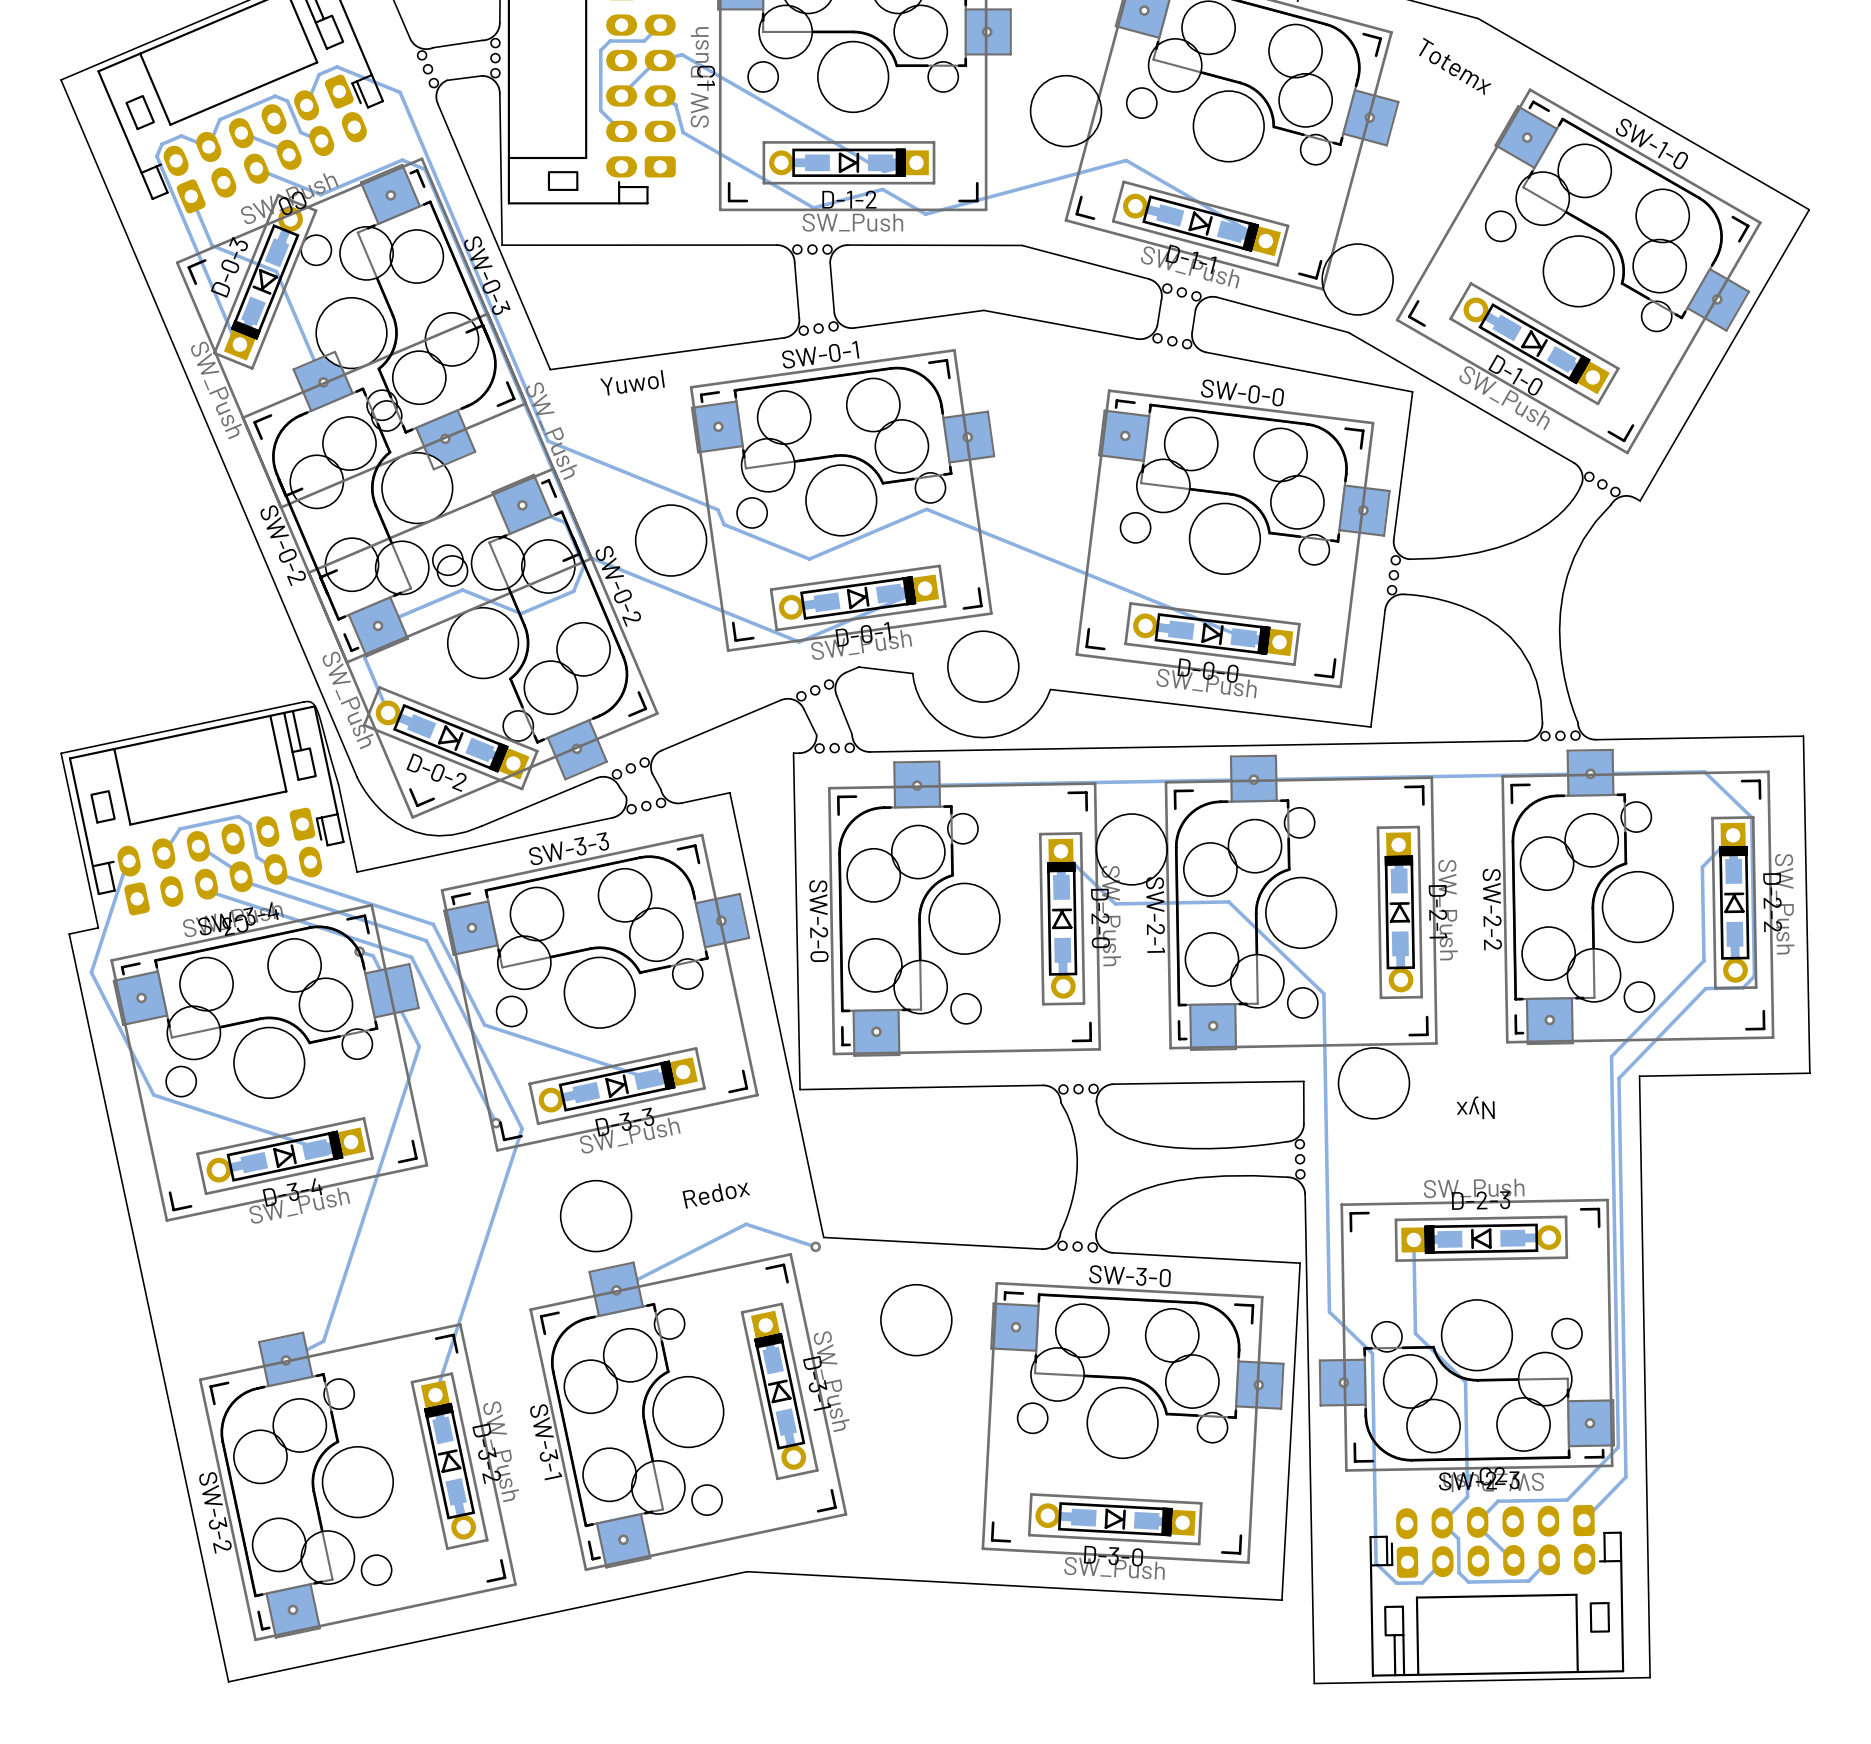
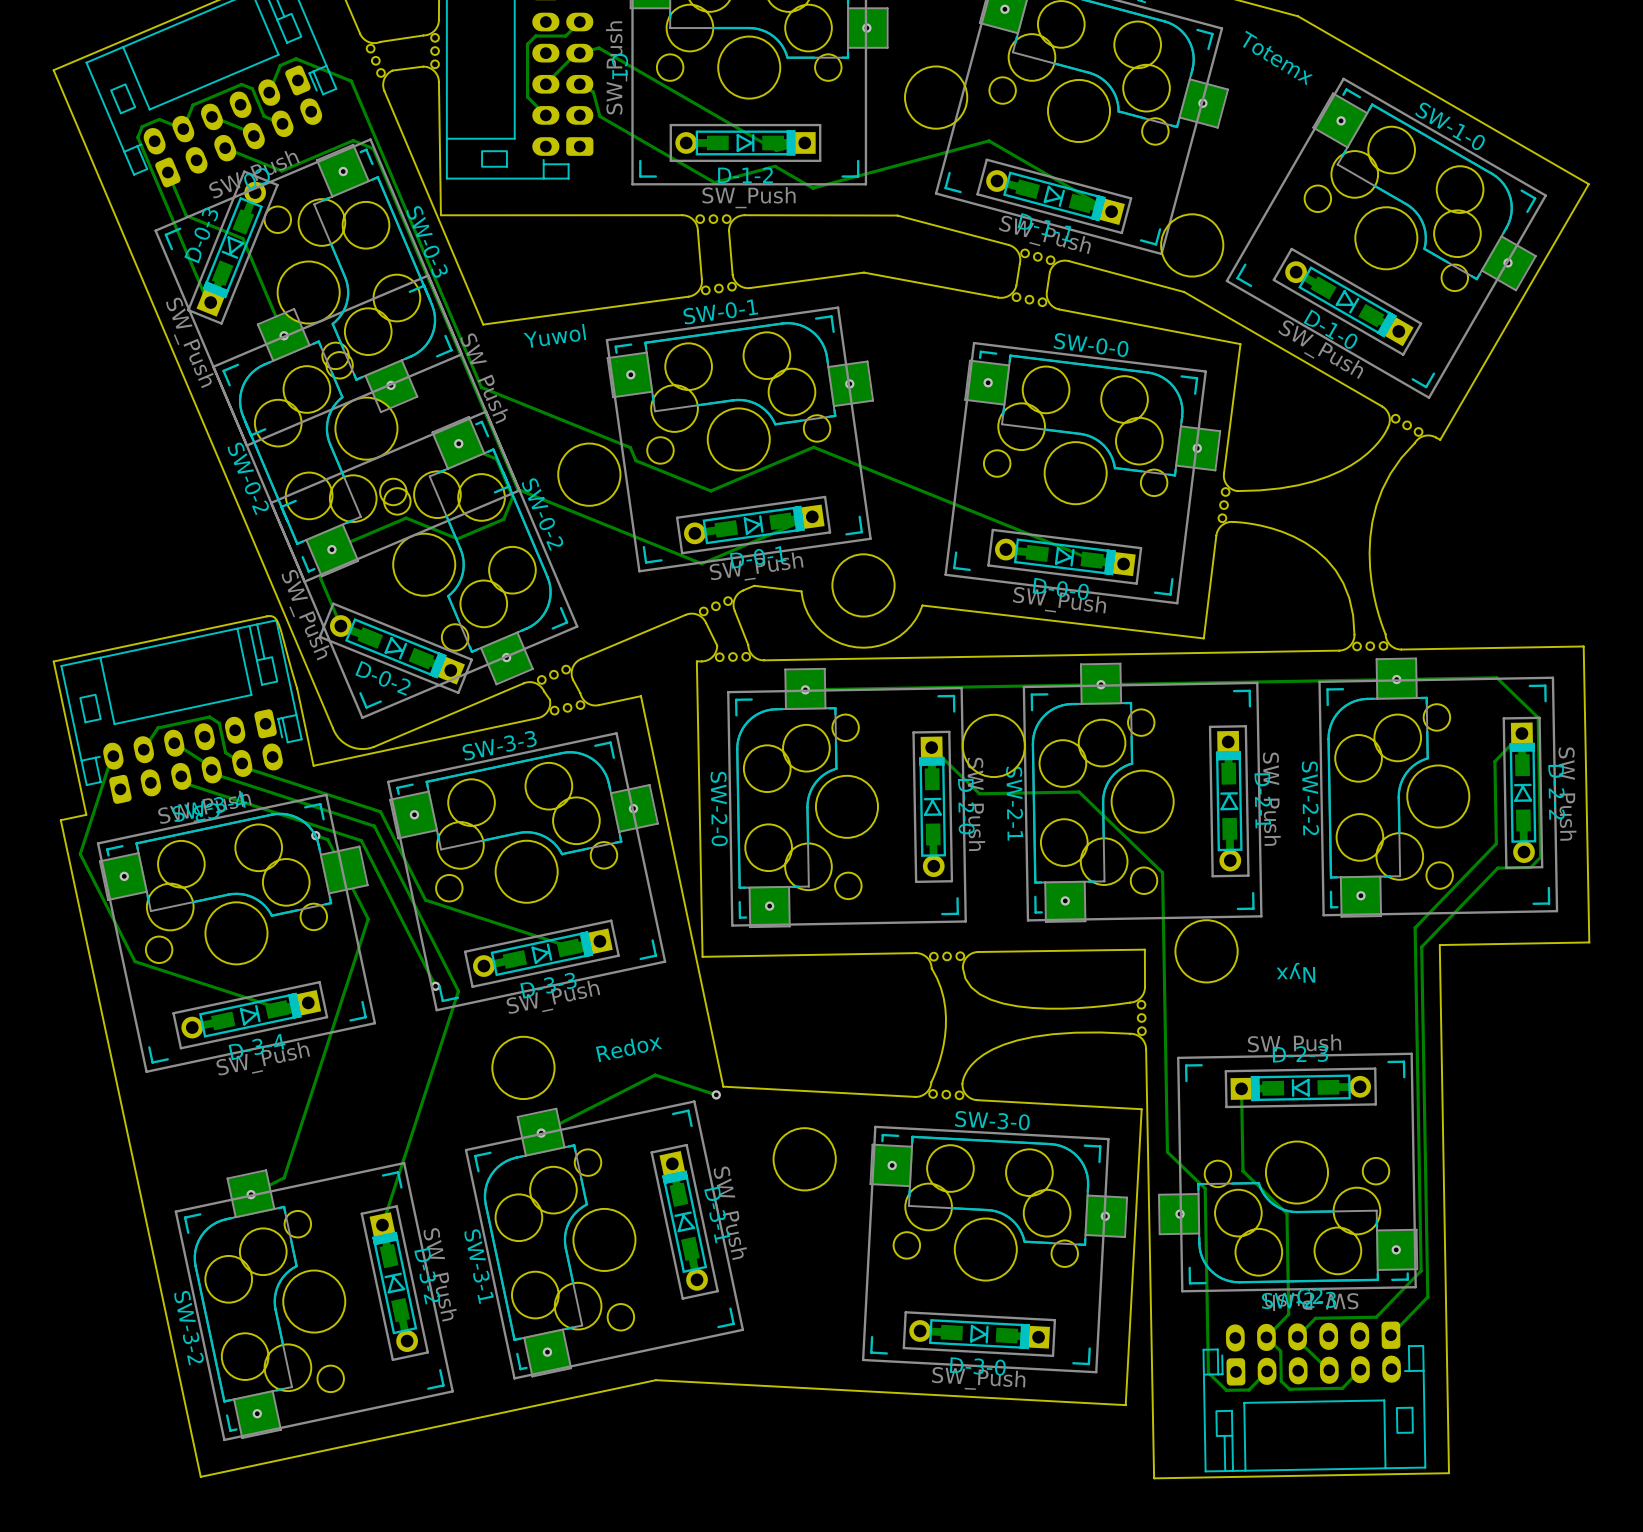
board edge: (357, 777) (374, 803) (396, 822) (415, 831) (439, 835) (466, 831) (596, 778) -> (313, 682) (338, 737) (349, 746) (363, 749) (373, 747) (523, 683)

